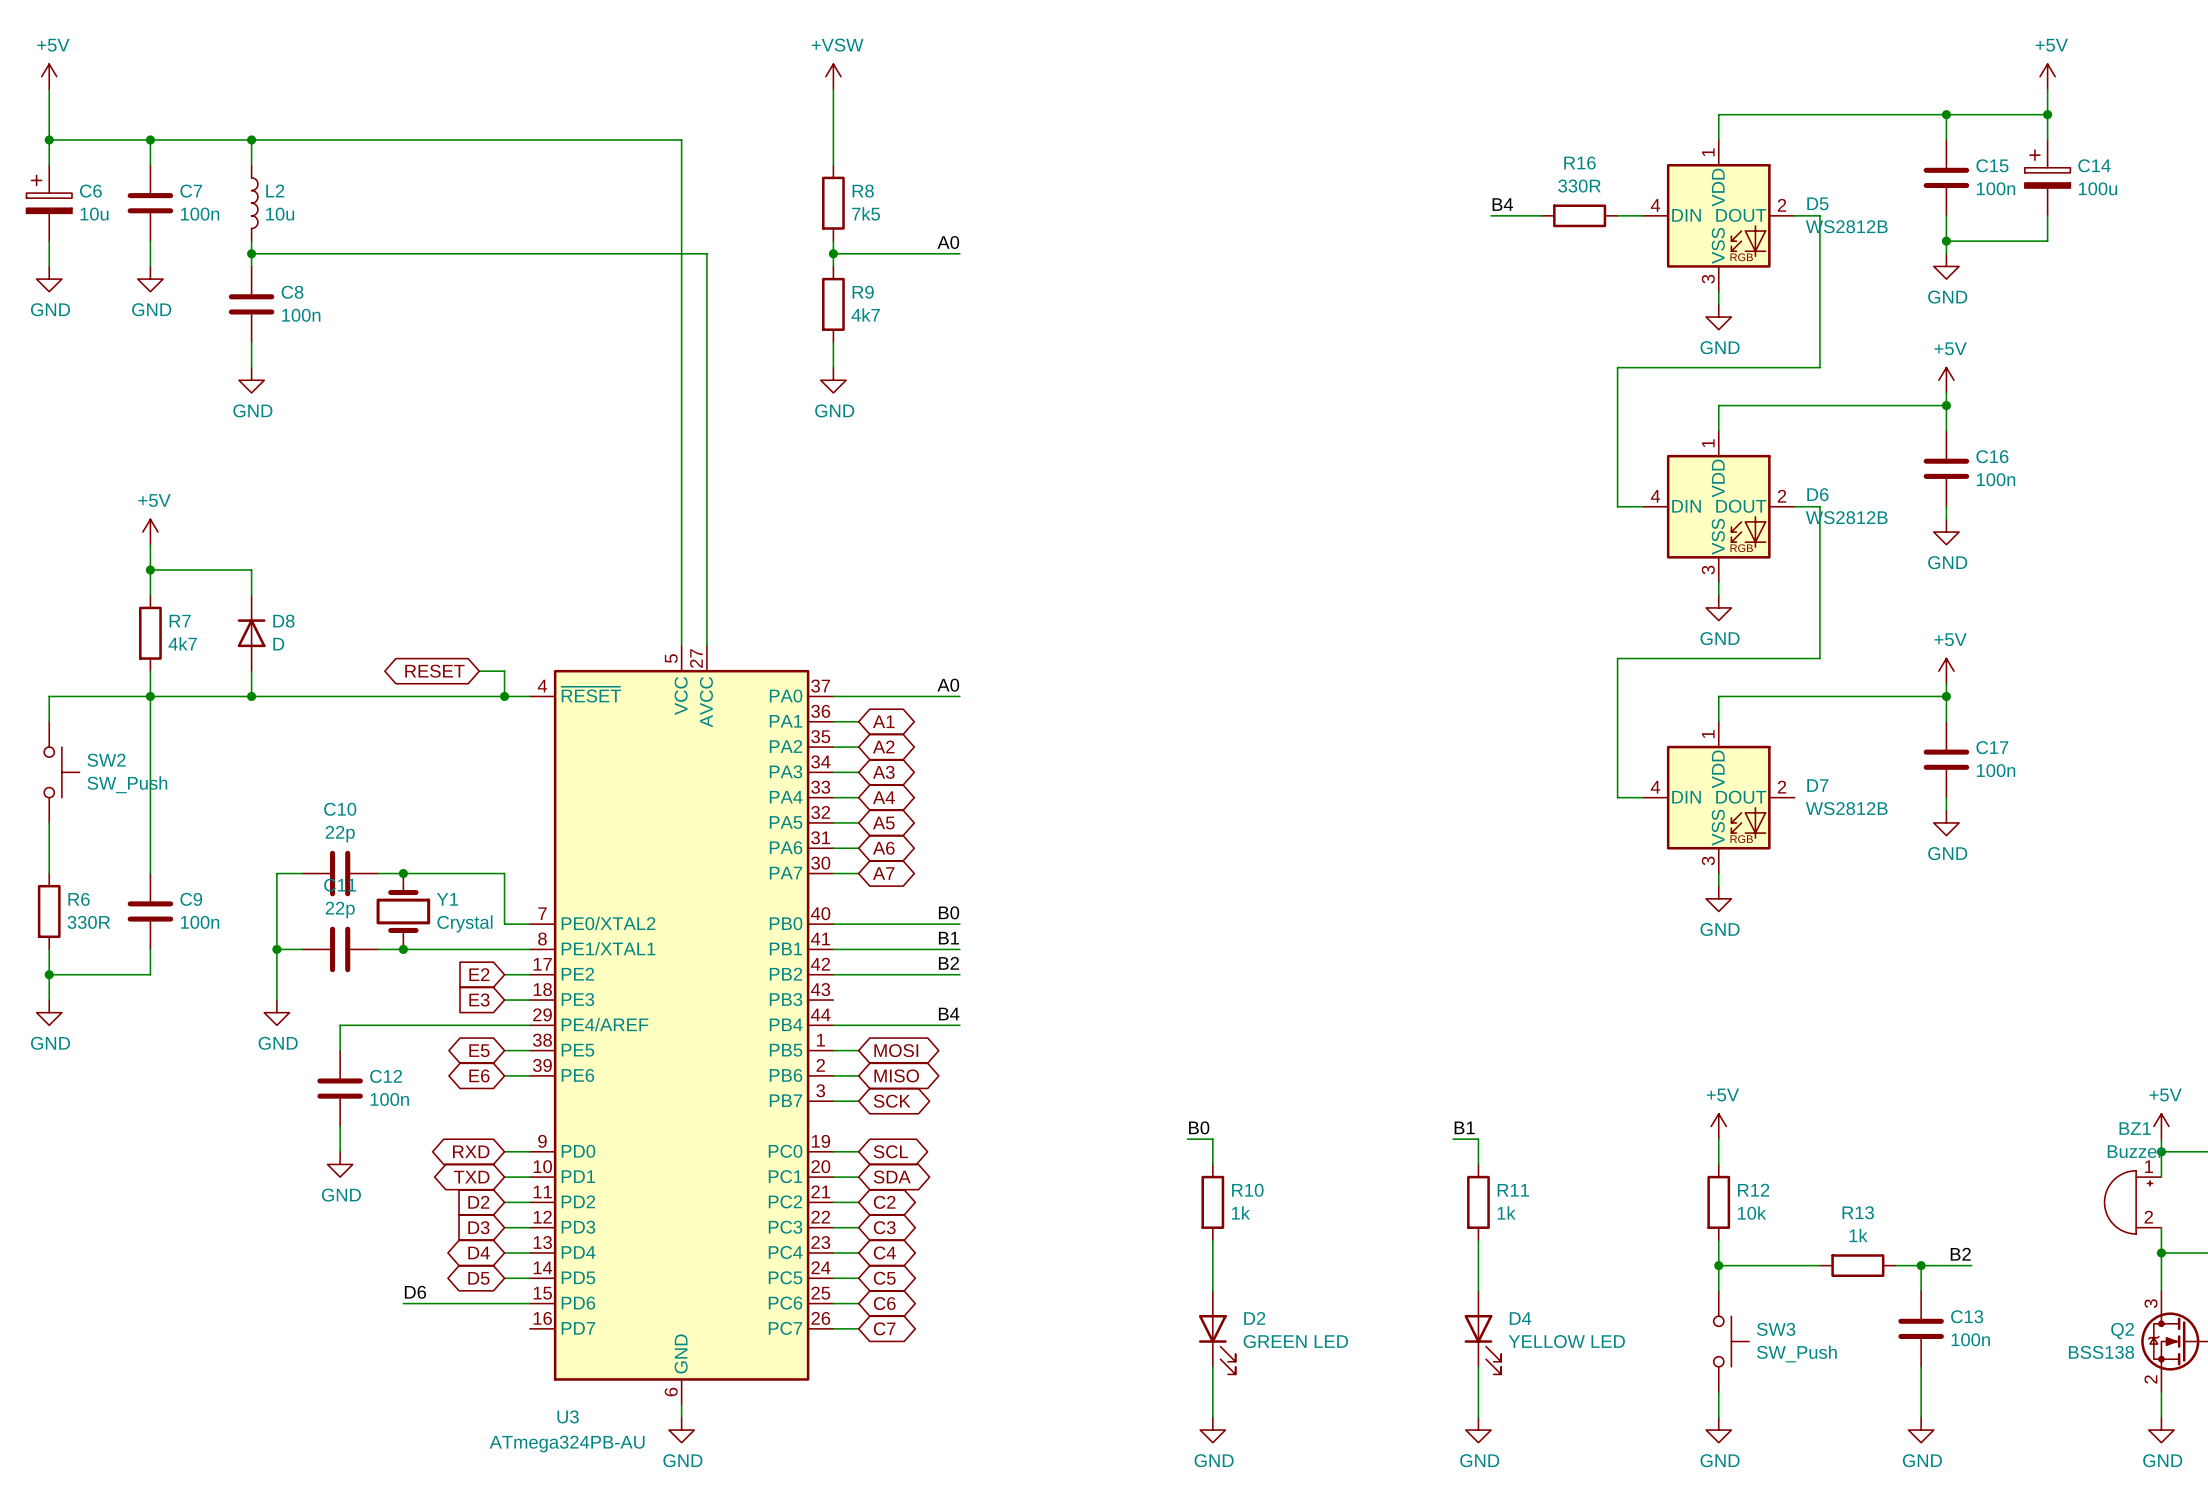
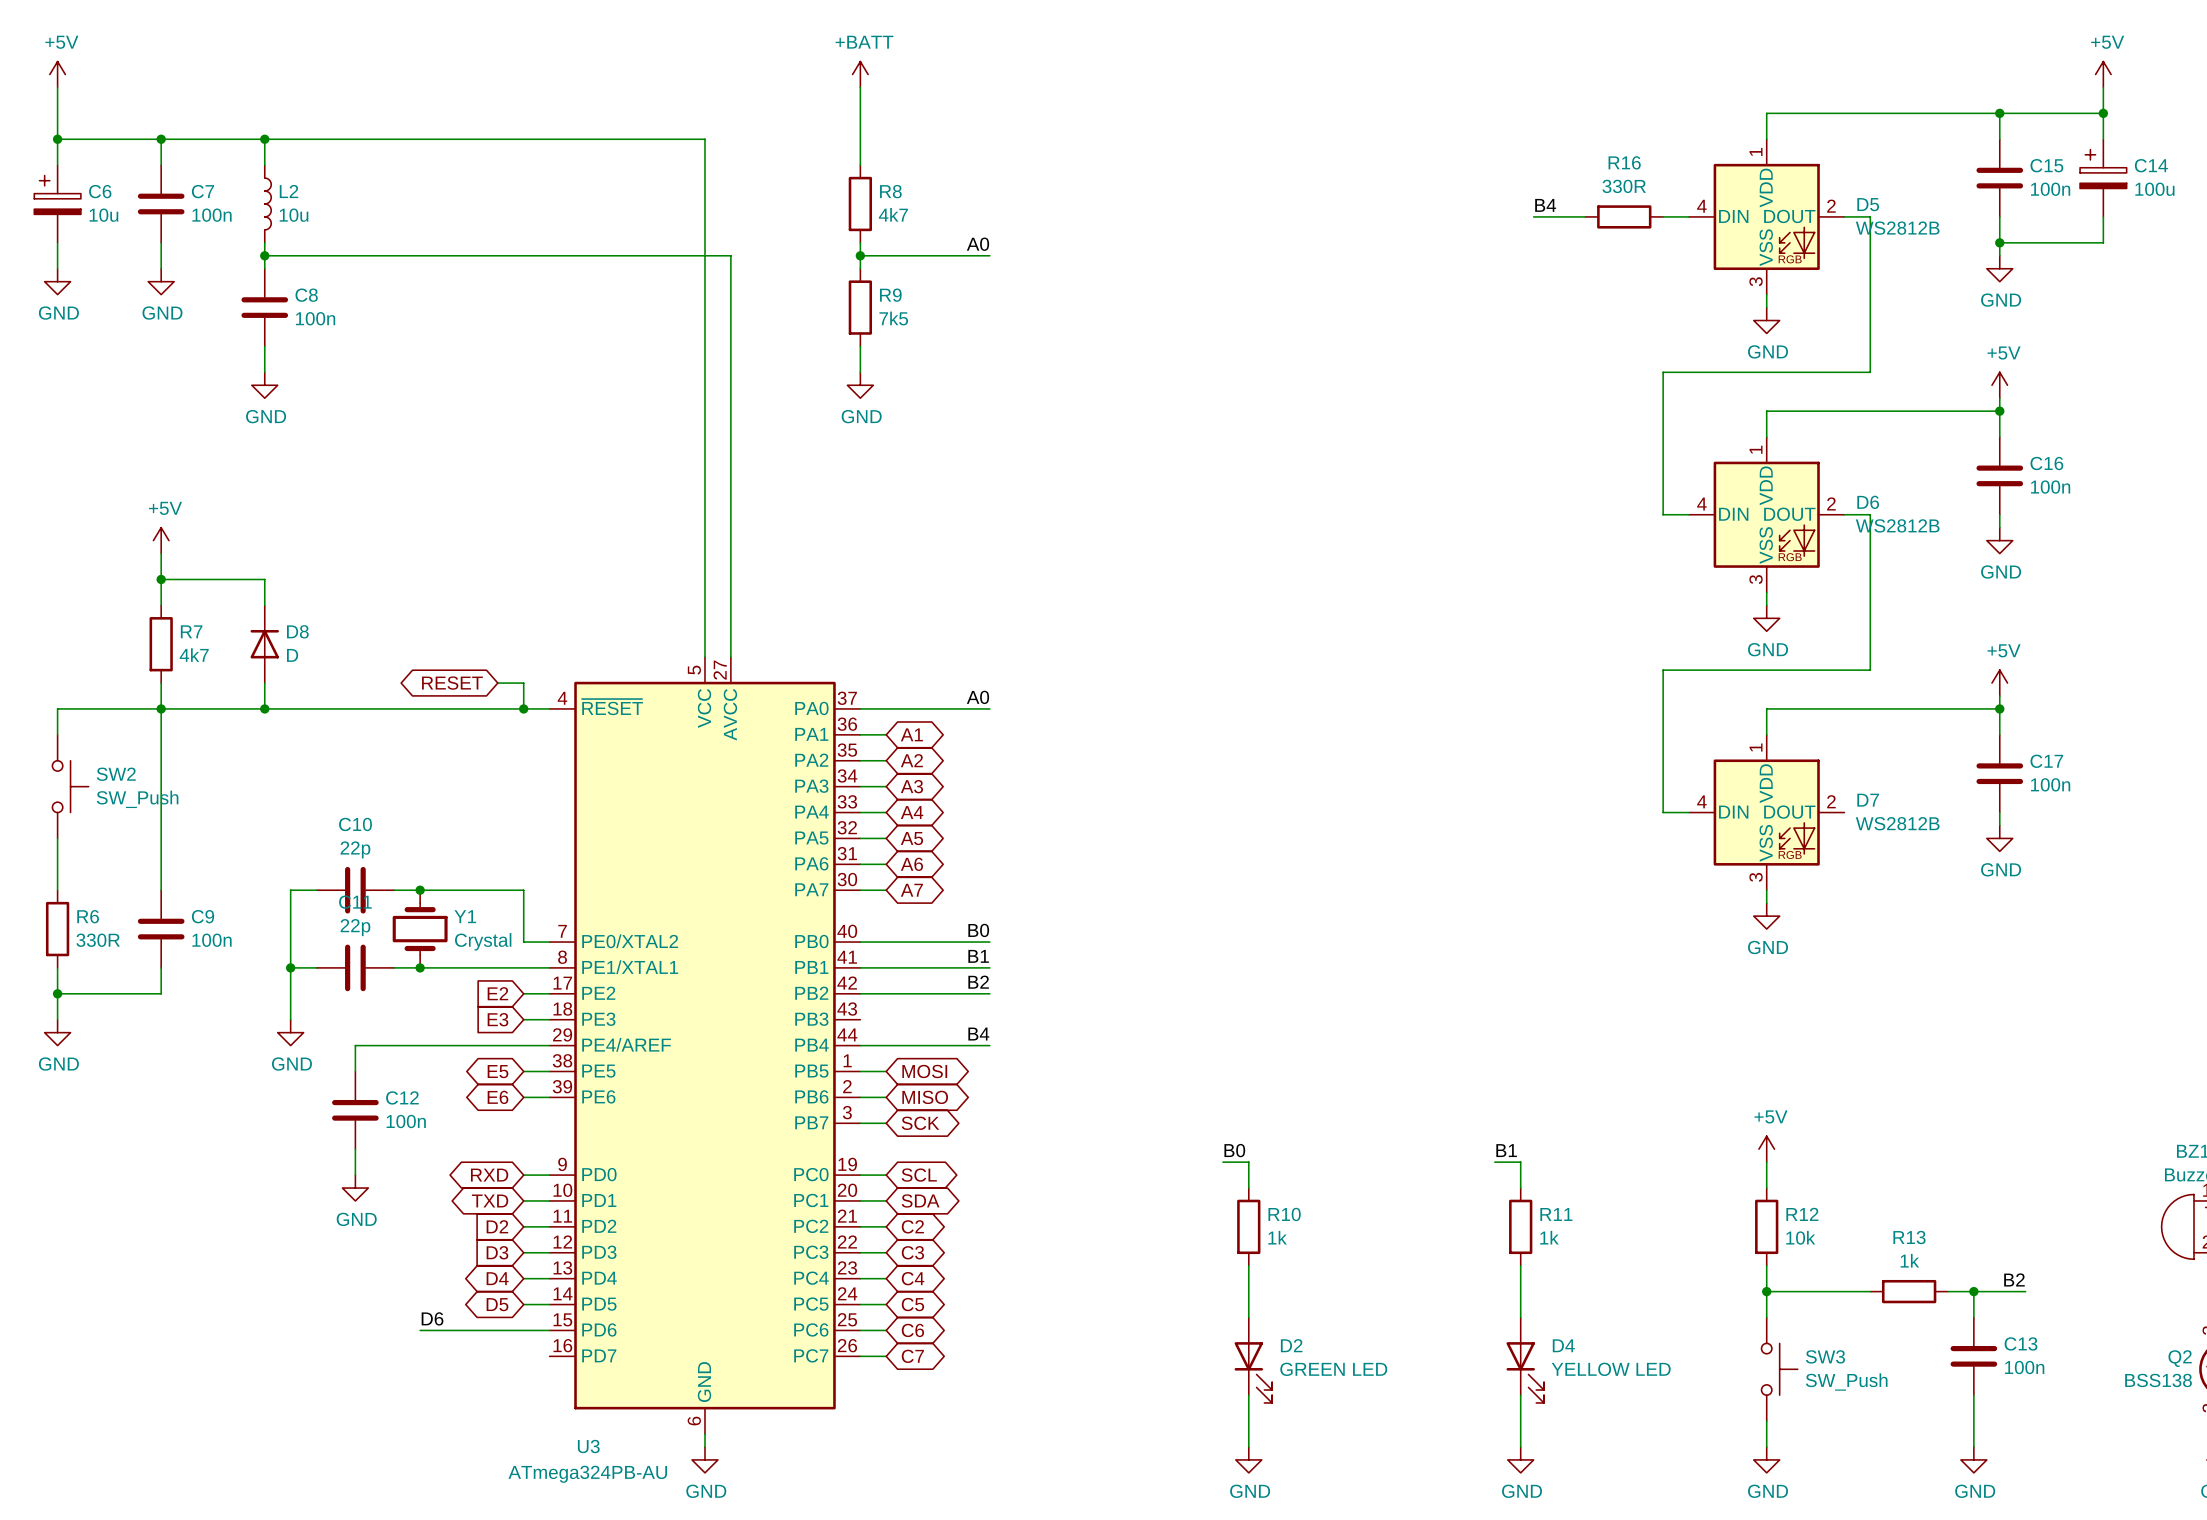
power symbol: +VSW (833, 76) -> +BATT (860, 74)
R8 value: 7k5 (866, 213) -> 4k7 (893, 214)
R9 value: 4k7 (865, 314) -> 7k5 (893, 318)

